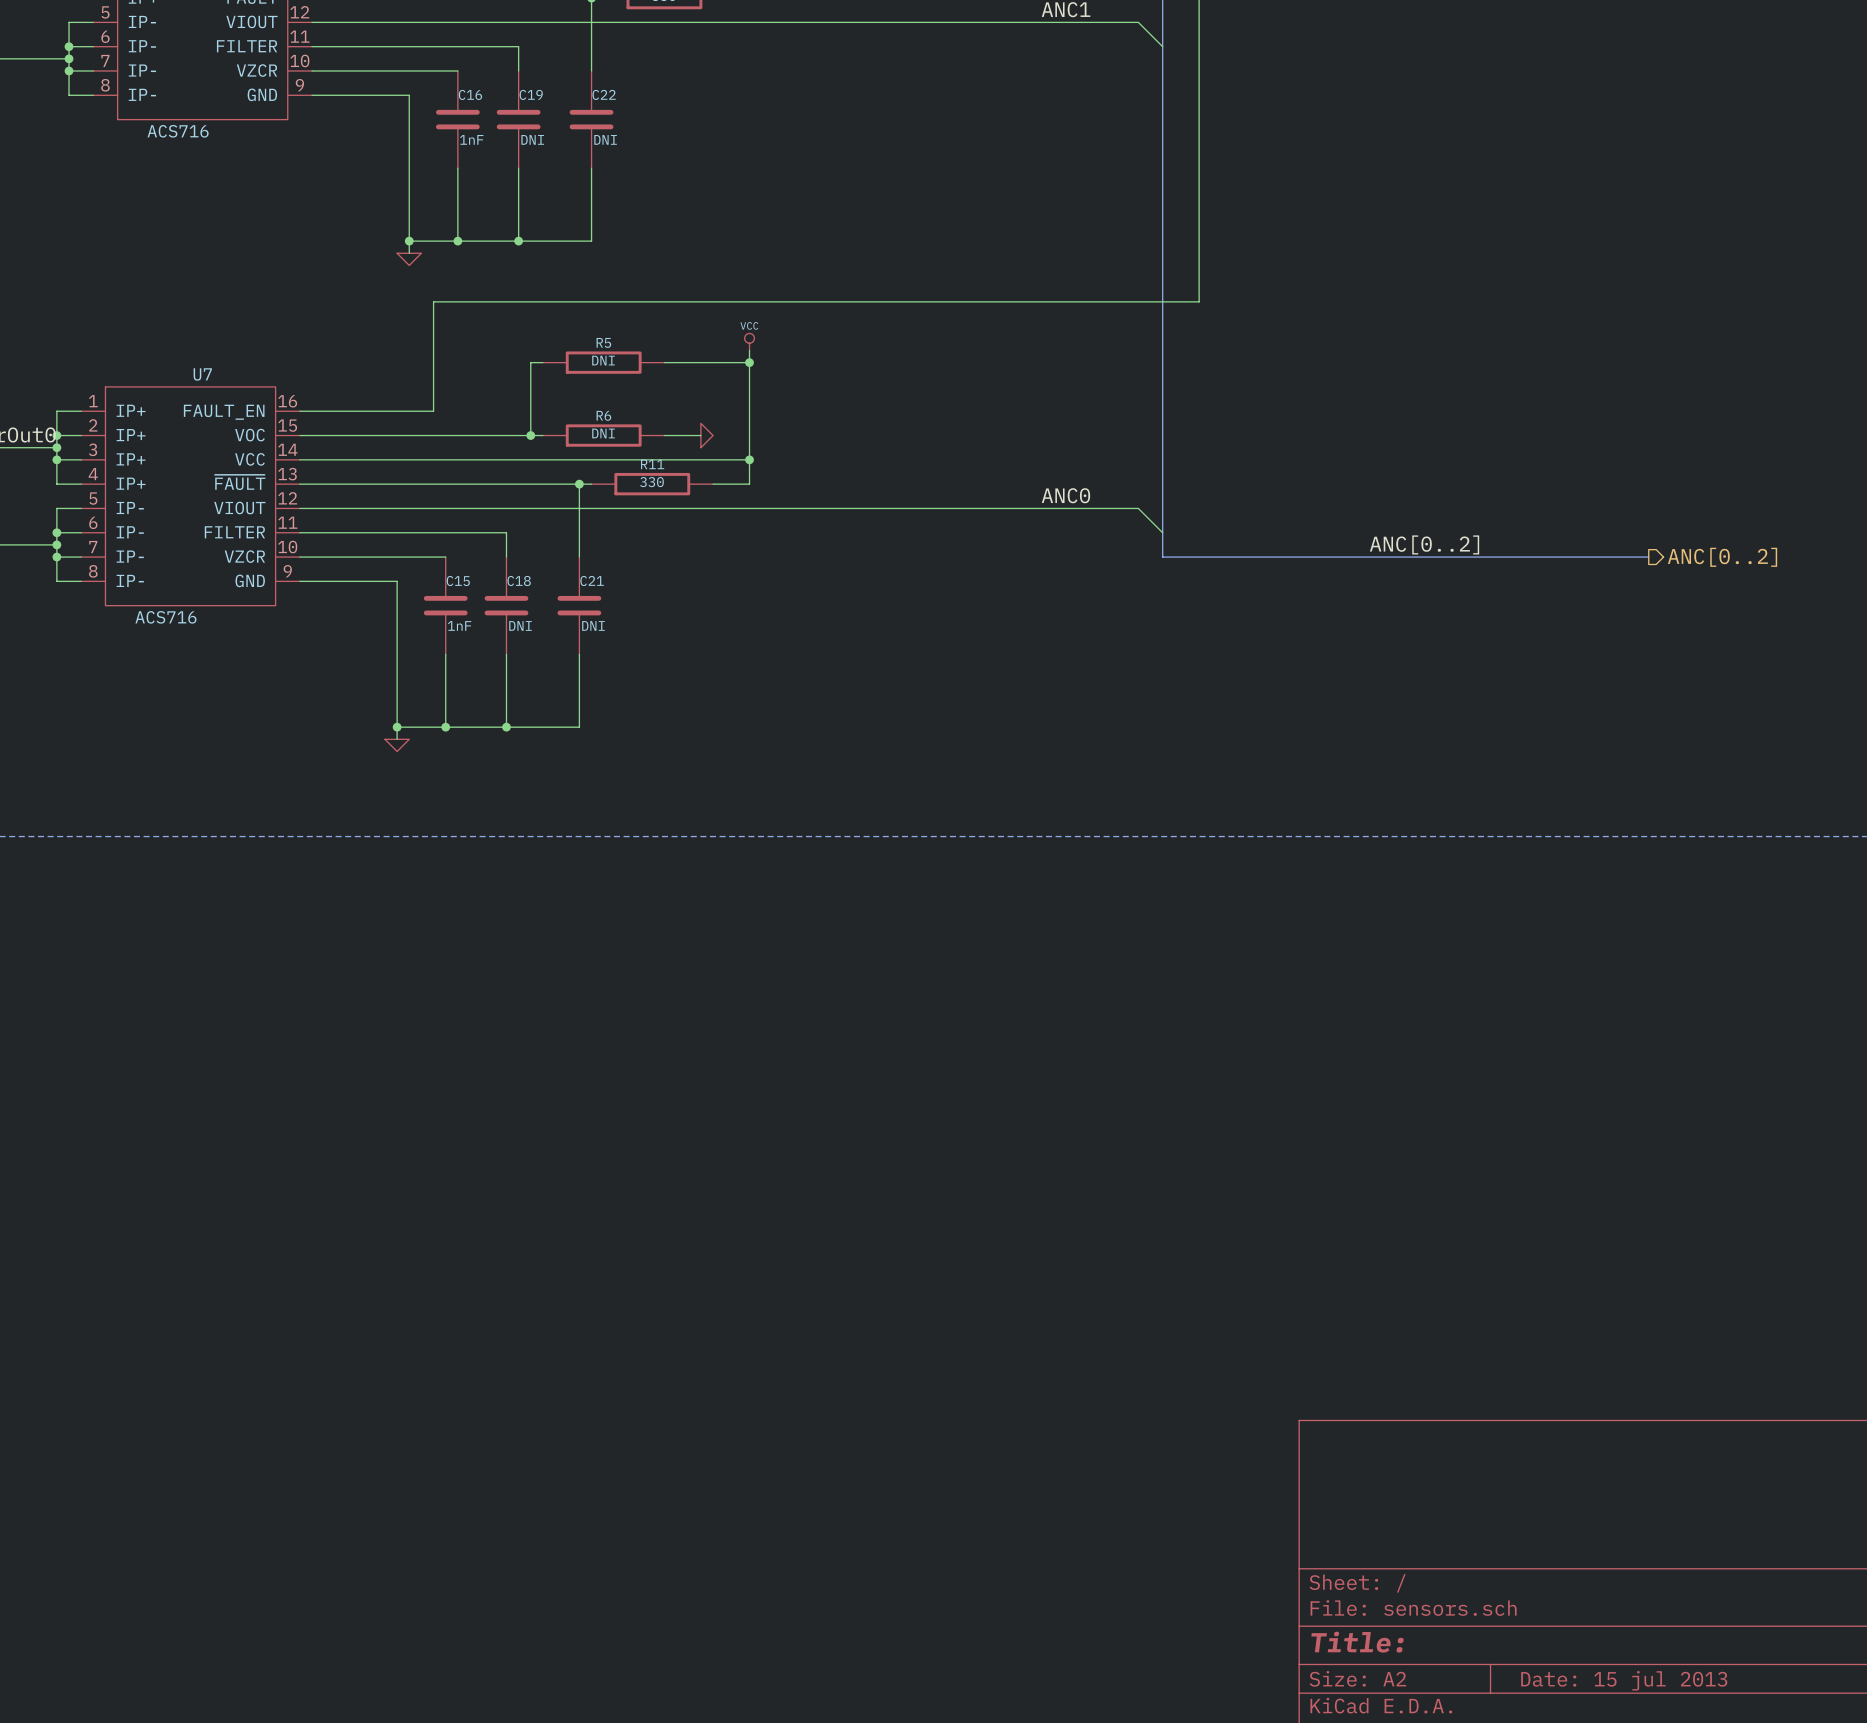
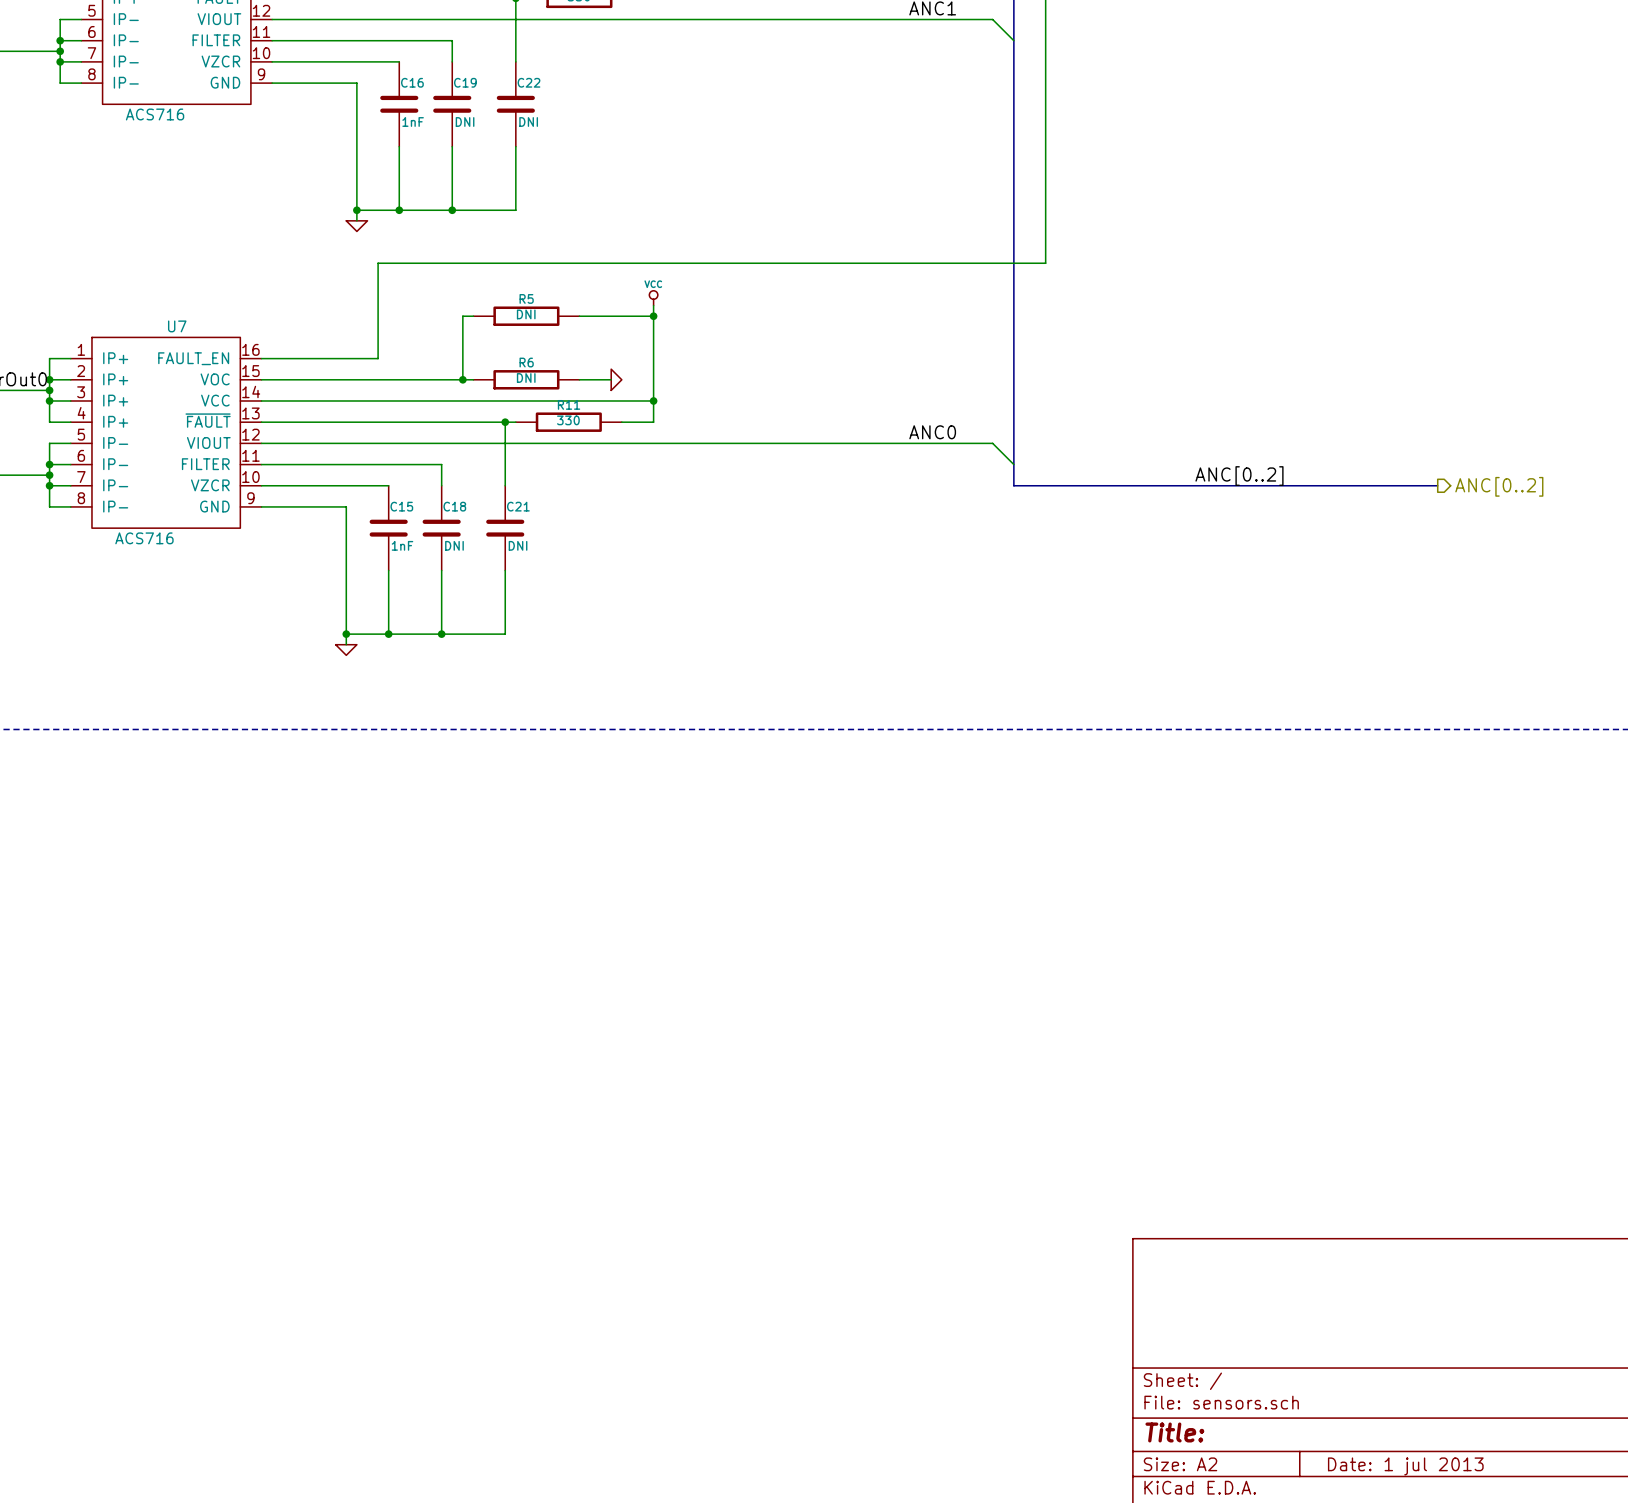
title block: Date: 15 jul 2013 (1624, 1680) -> Date: 1 jul 2013 (1405, 1466)

